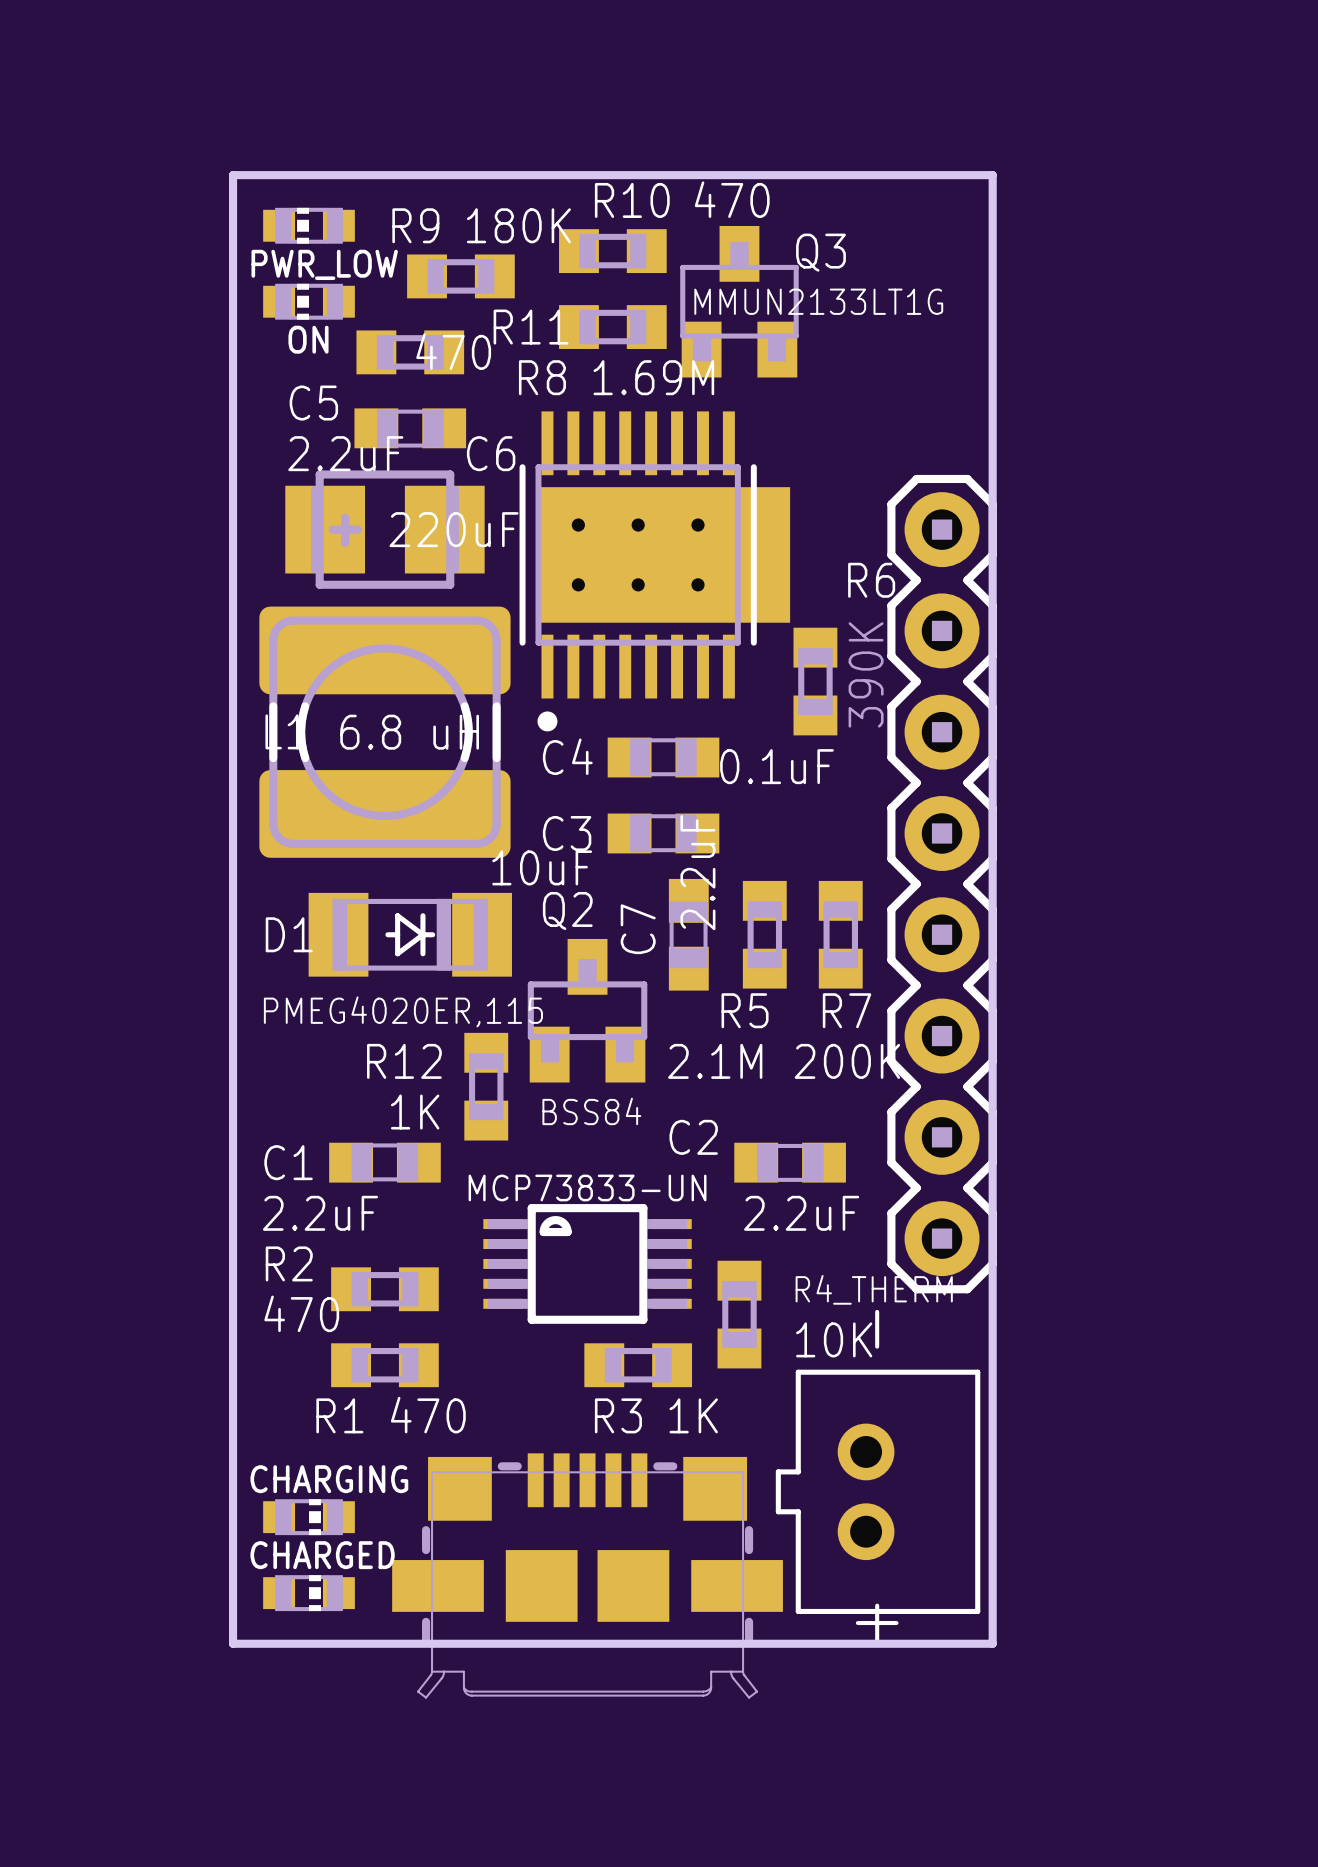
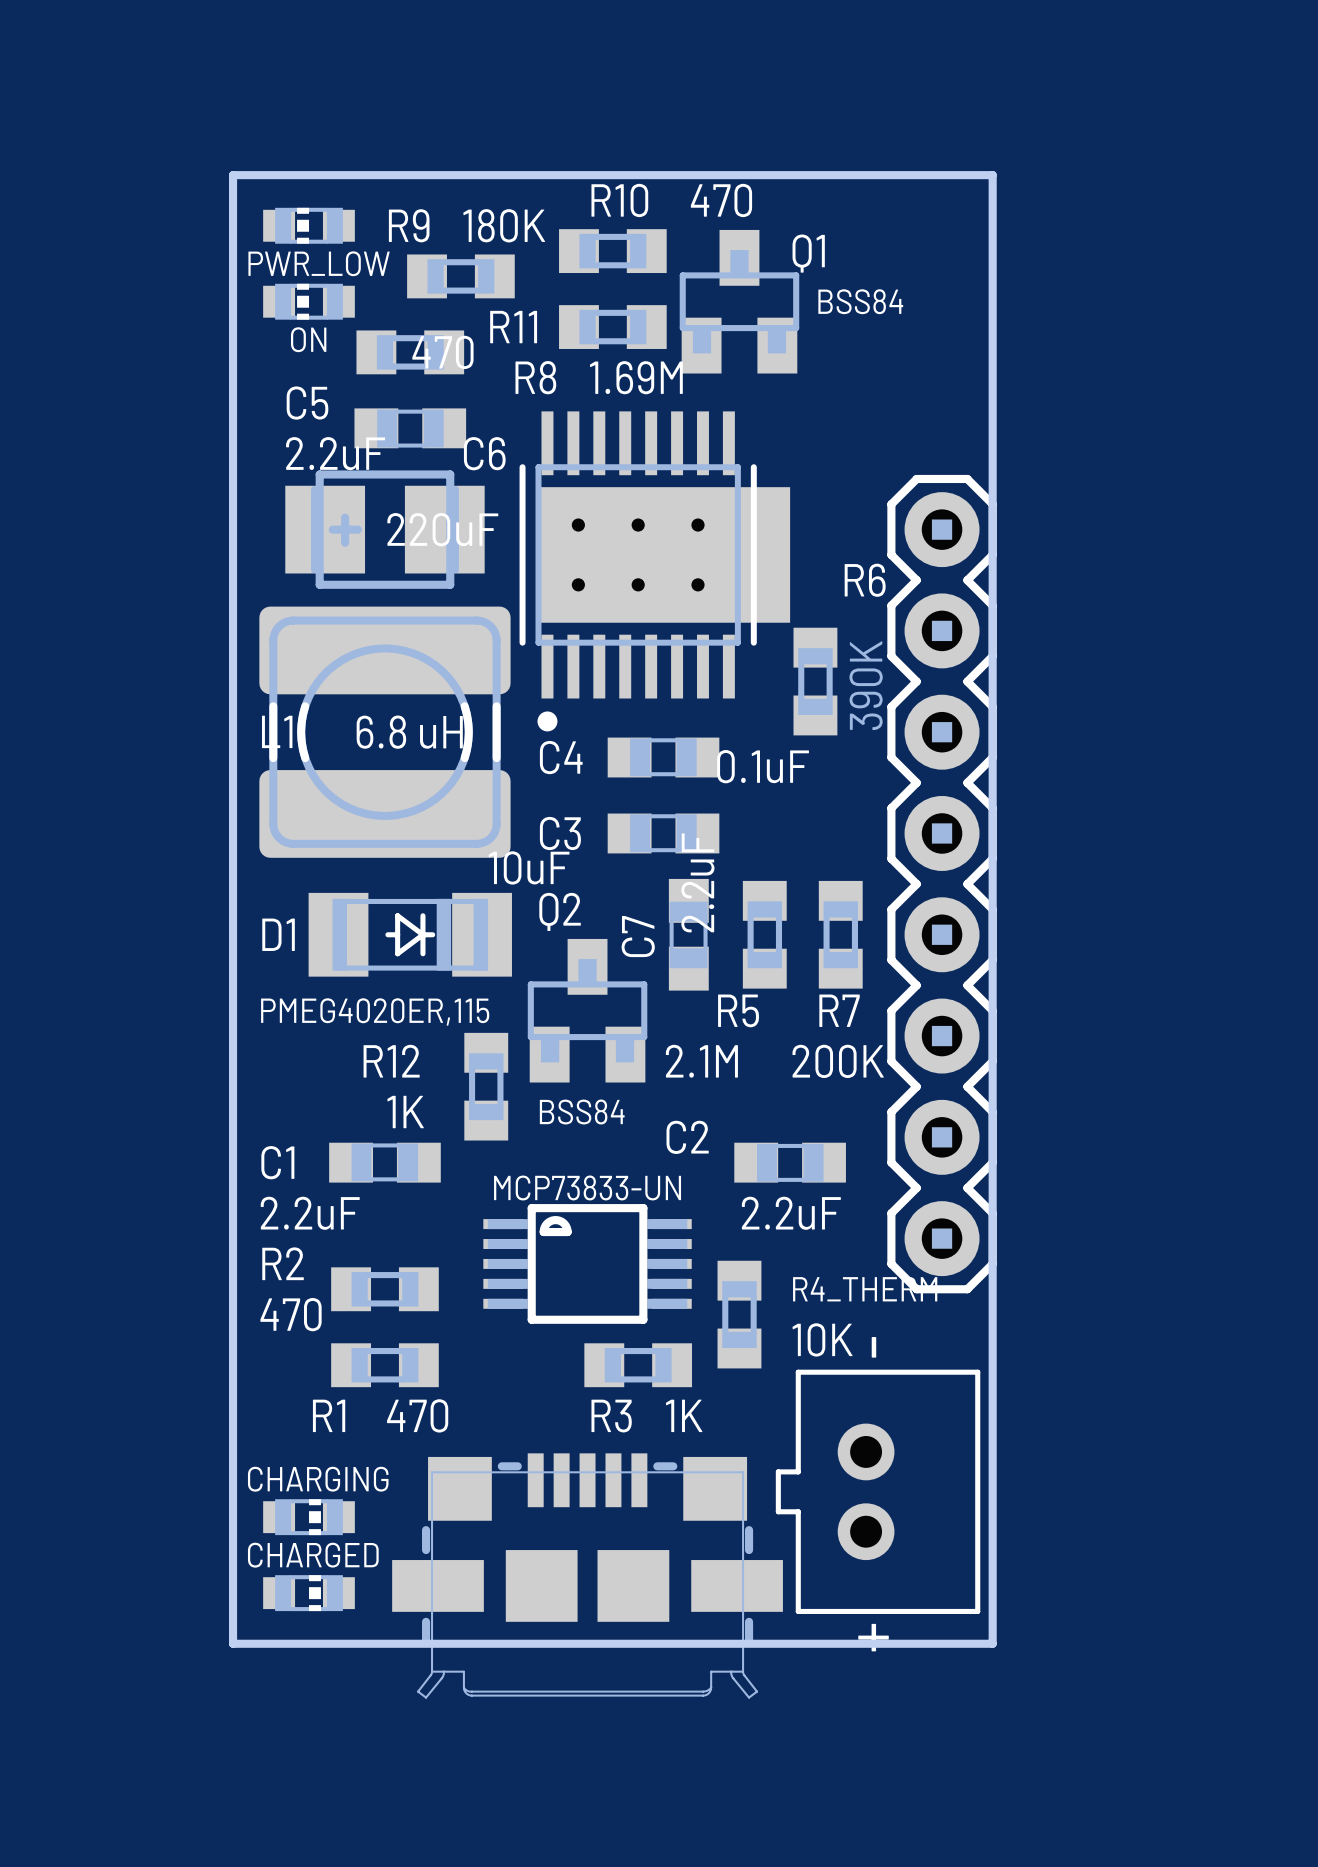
Q3: MMUN2133LT1G (739, 301) -> none
Q1: none -> BSS84 (739, 301)

